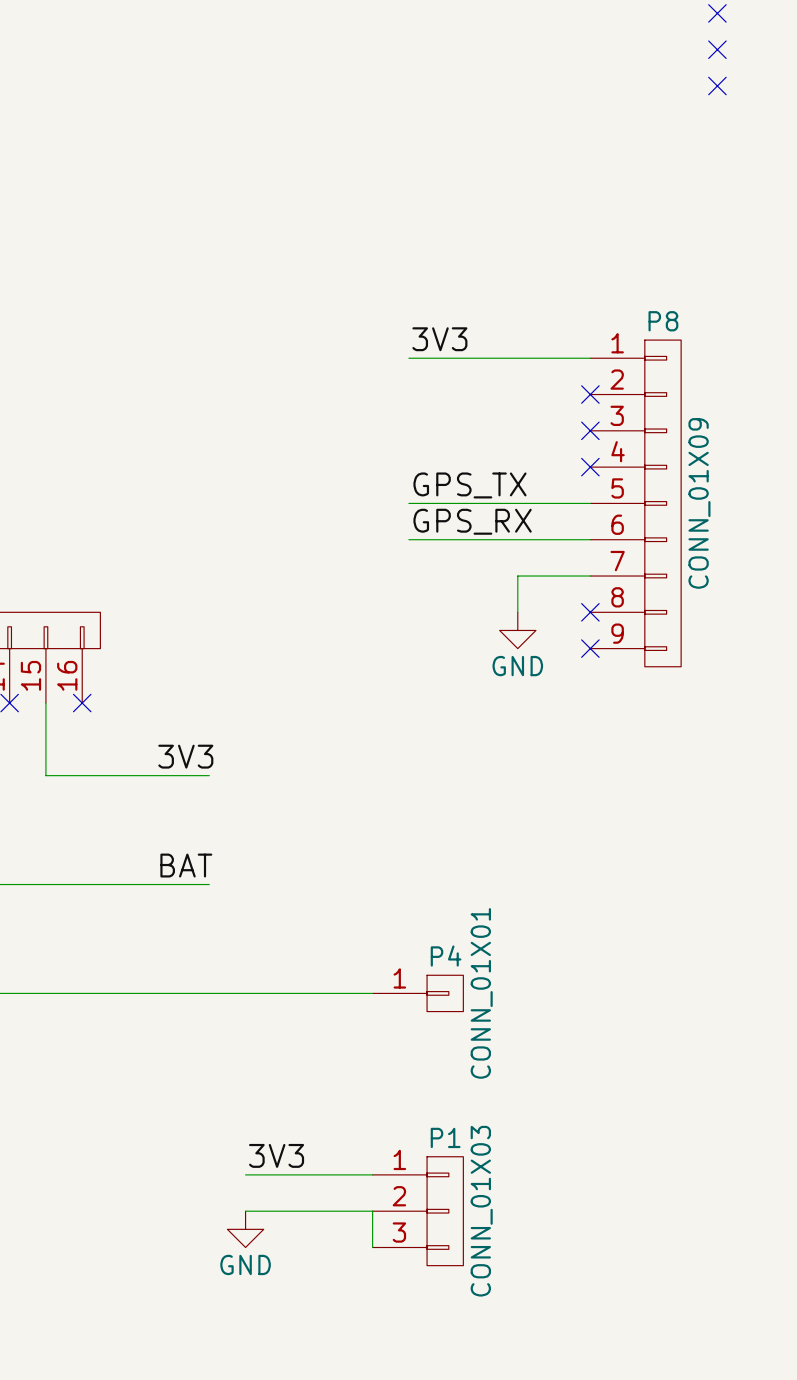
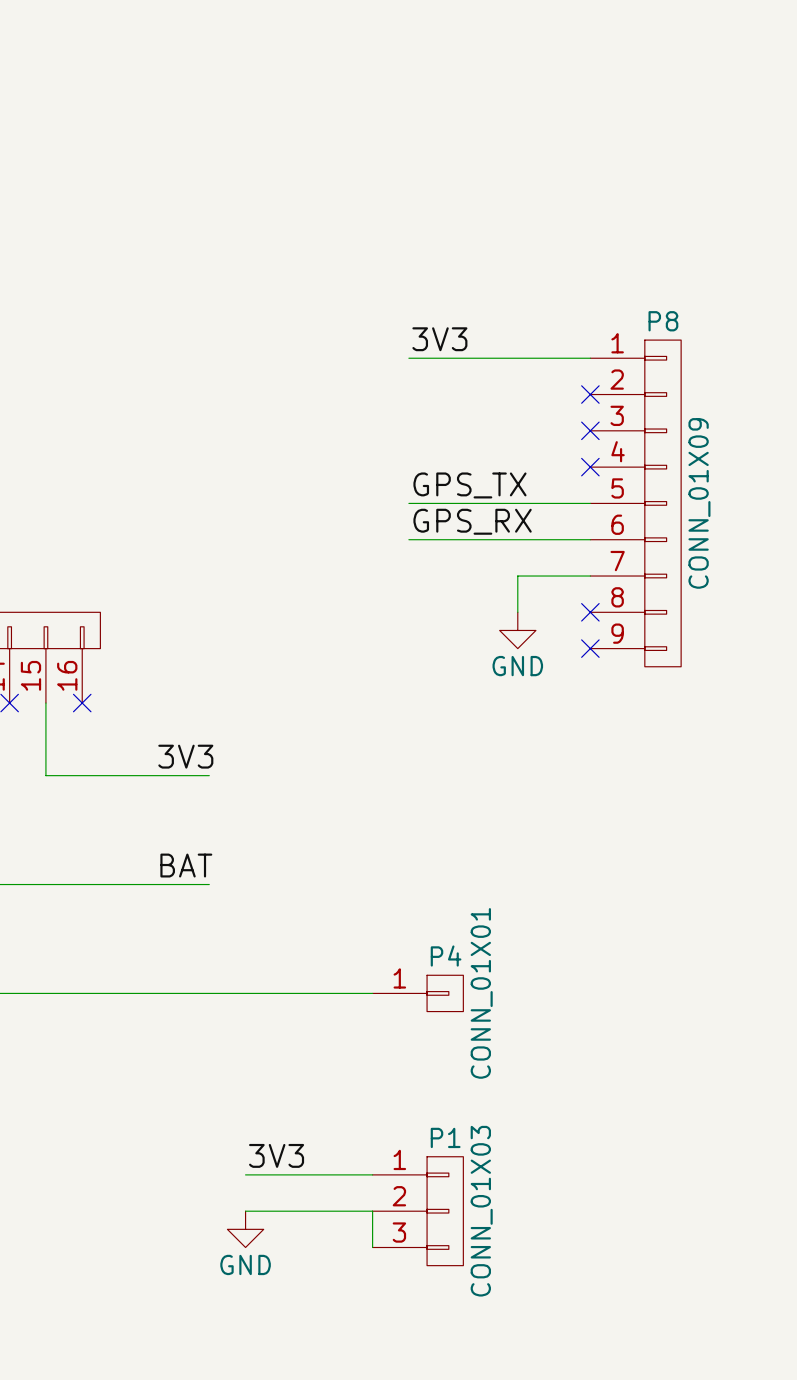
no-connect mark: (717, 13) -> none
no-connect mark: (717, 49) -> none
no-connect mark: (717, 86) -> none

